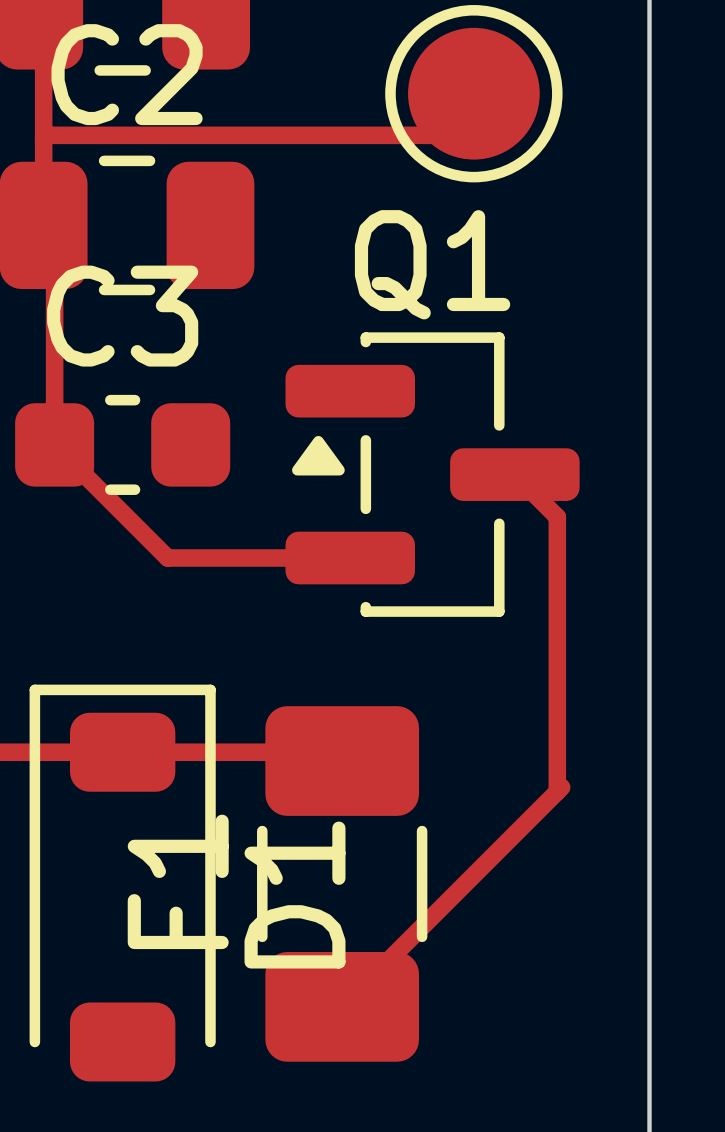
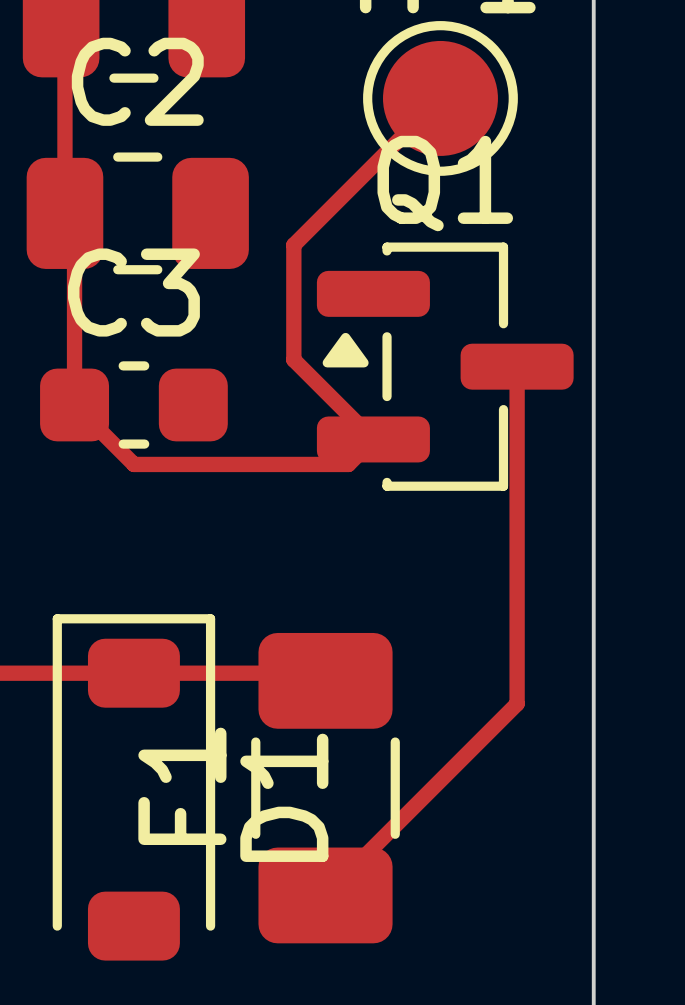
track: (432, 135) (45, 135) (43, 137) -> (404, 134) (293, 245) (293, 359) (373, 439) (348, 464) (134, 464)
track: none -> (517, 366) (517, 703)
Q1 position: (432, 474) -> (445, 366)
track: (514, 474) (557, 517) (557, 791) -> none
track: (122, 513) (167, 558) (350, 558) -> none

